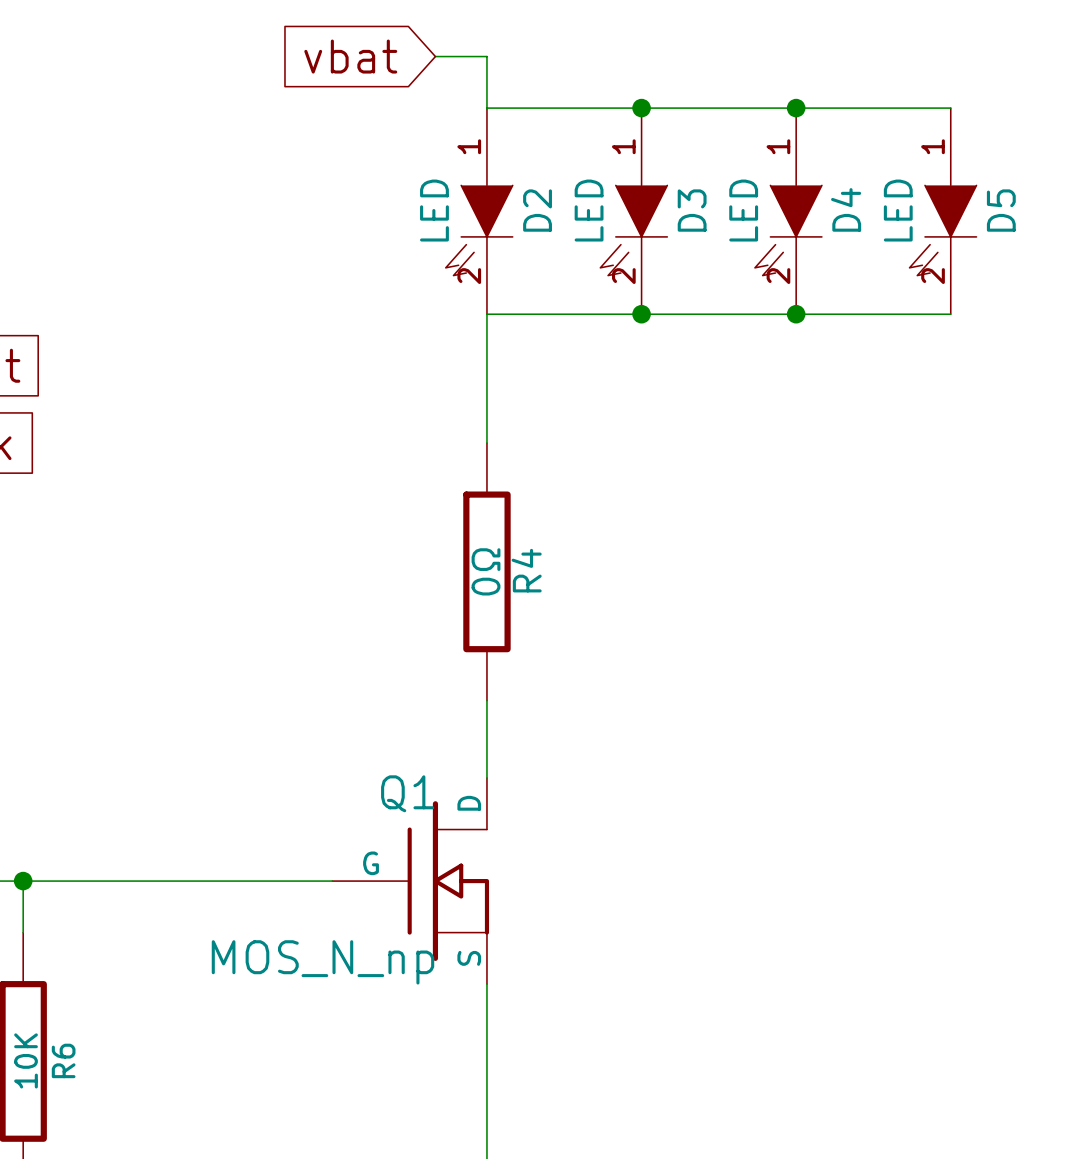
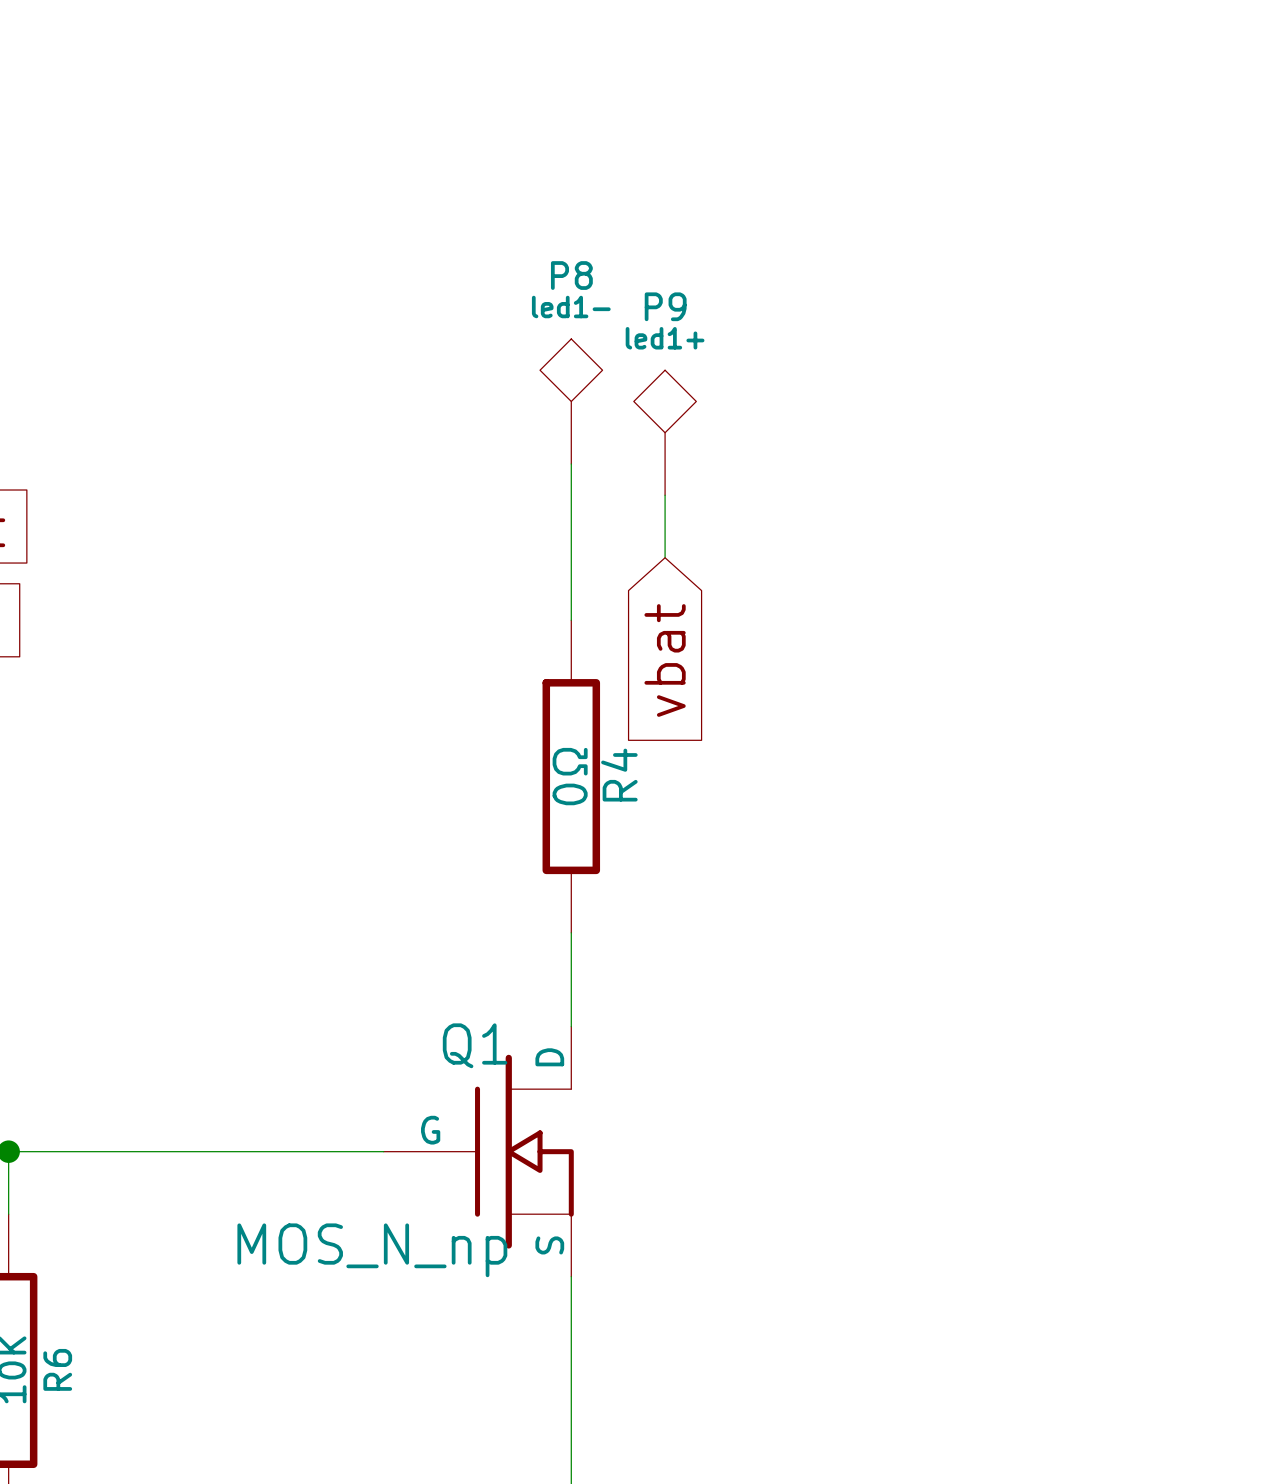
global label rotation: 0° (350, 56) -> 90° counterclockwise (665, 660)
global label position: vbat (350, 56) -> vbat (665, 660)
wire: (435, 56) (486, 56) (486, 108) (950, 108) -> none
junction: (641, 108) -> none
junction: (796, 108) -> none
D2: LED (479, 211) -> none
D3: LED (633, 211) -> none
D4: LED (788, 211) -> none
D5: LED (943, 211) -> none
P8: none -> led1- (571, 401)
P9: none -> led1+ (665, 432)
wire: (486, 314) (950, 314) -> none
junction: (641, 314) -> none
junction: (796, 314) -> none
wire: none -> (665, 495) (665, 557)

